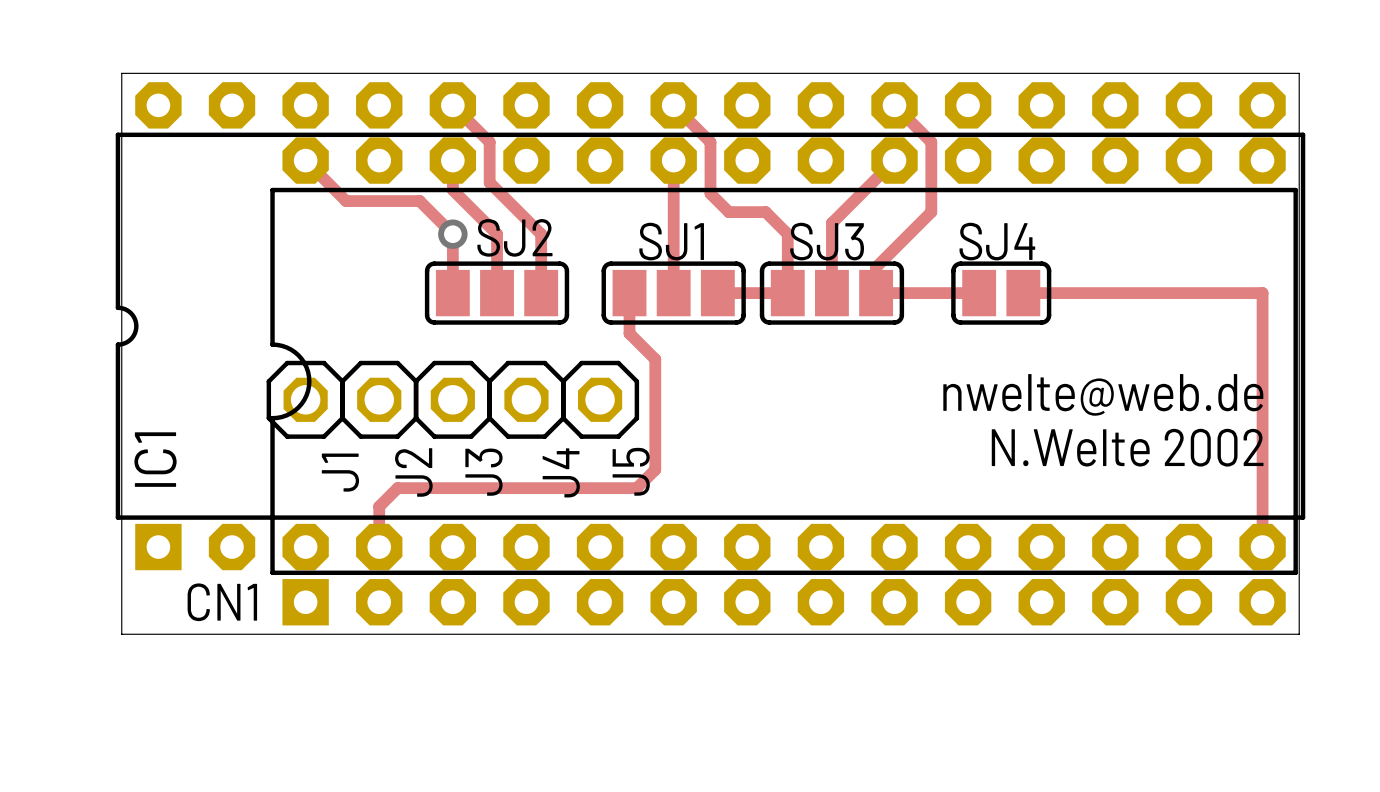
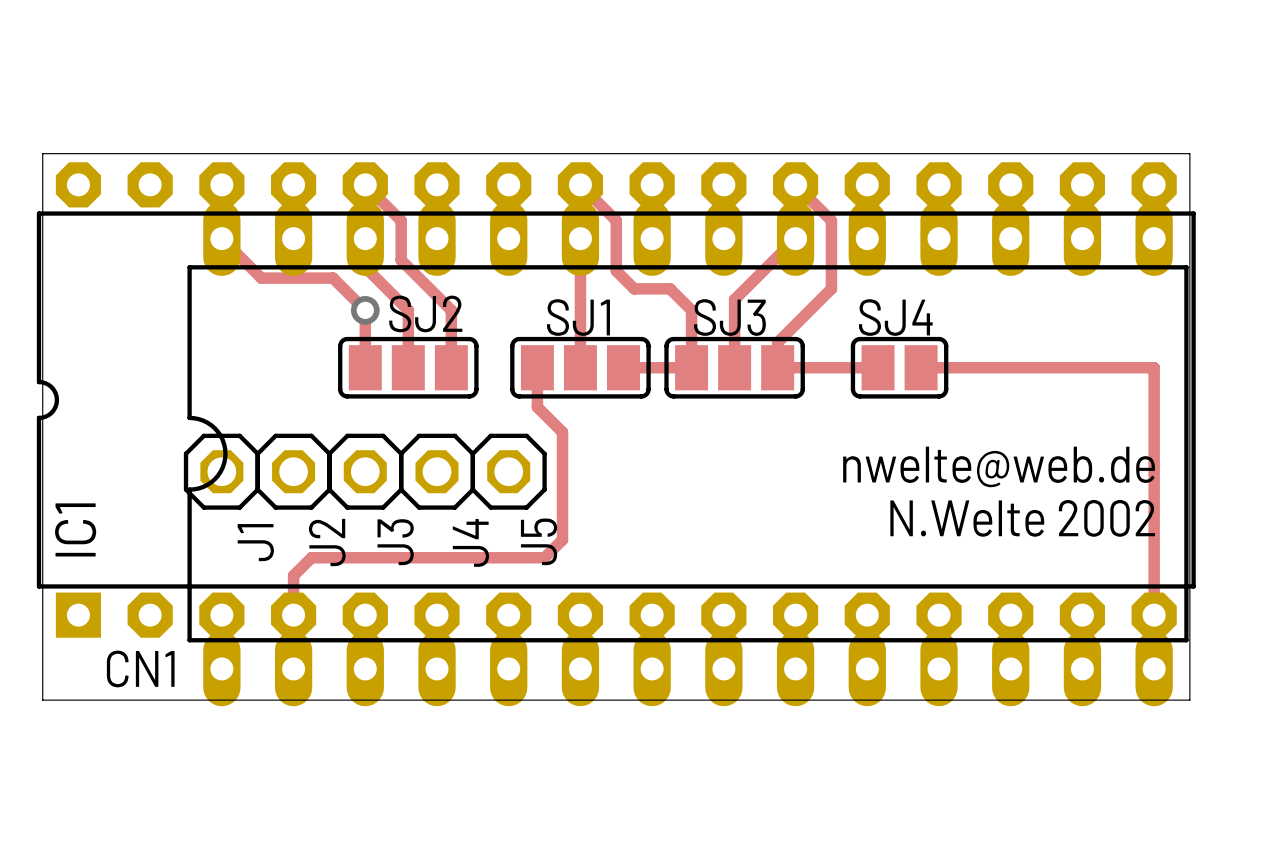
CN1 footprint: [270, 137, 1298, 626] -> [187, 201, 1189, 707]

